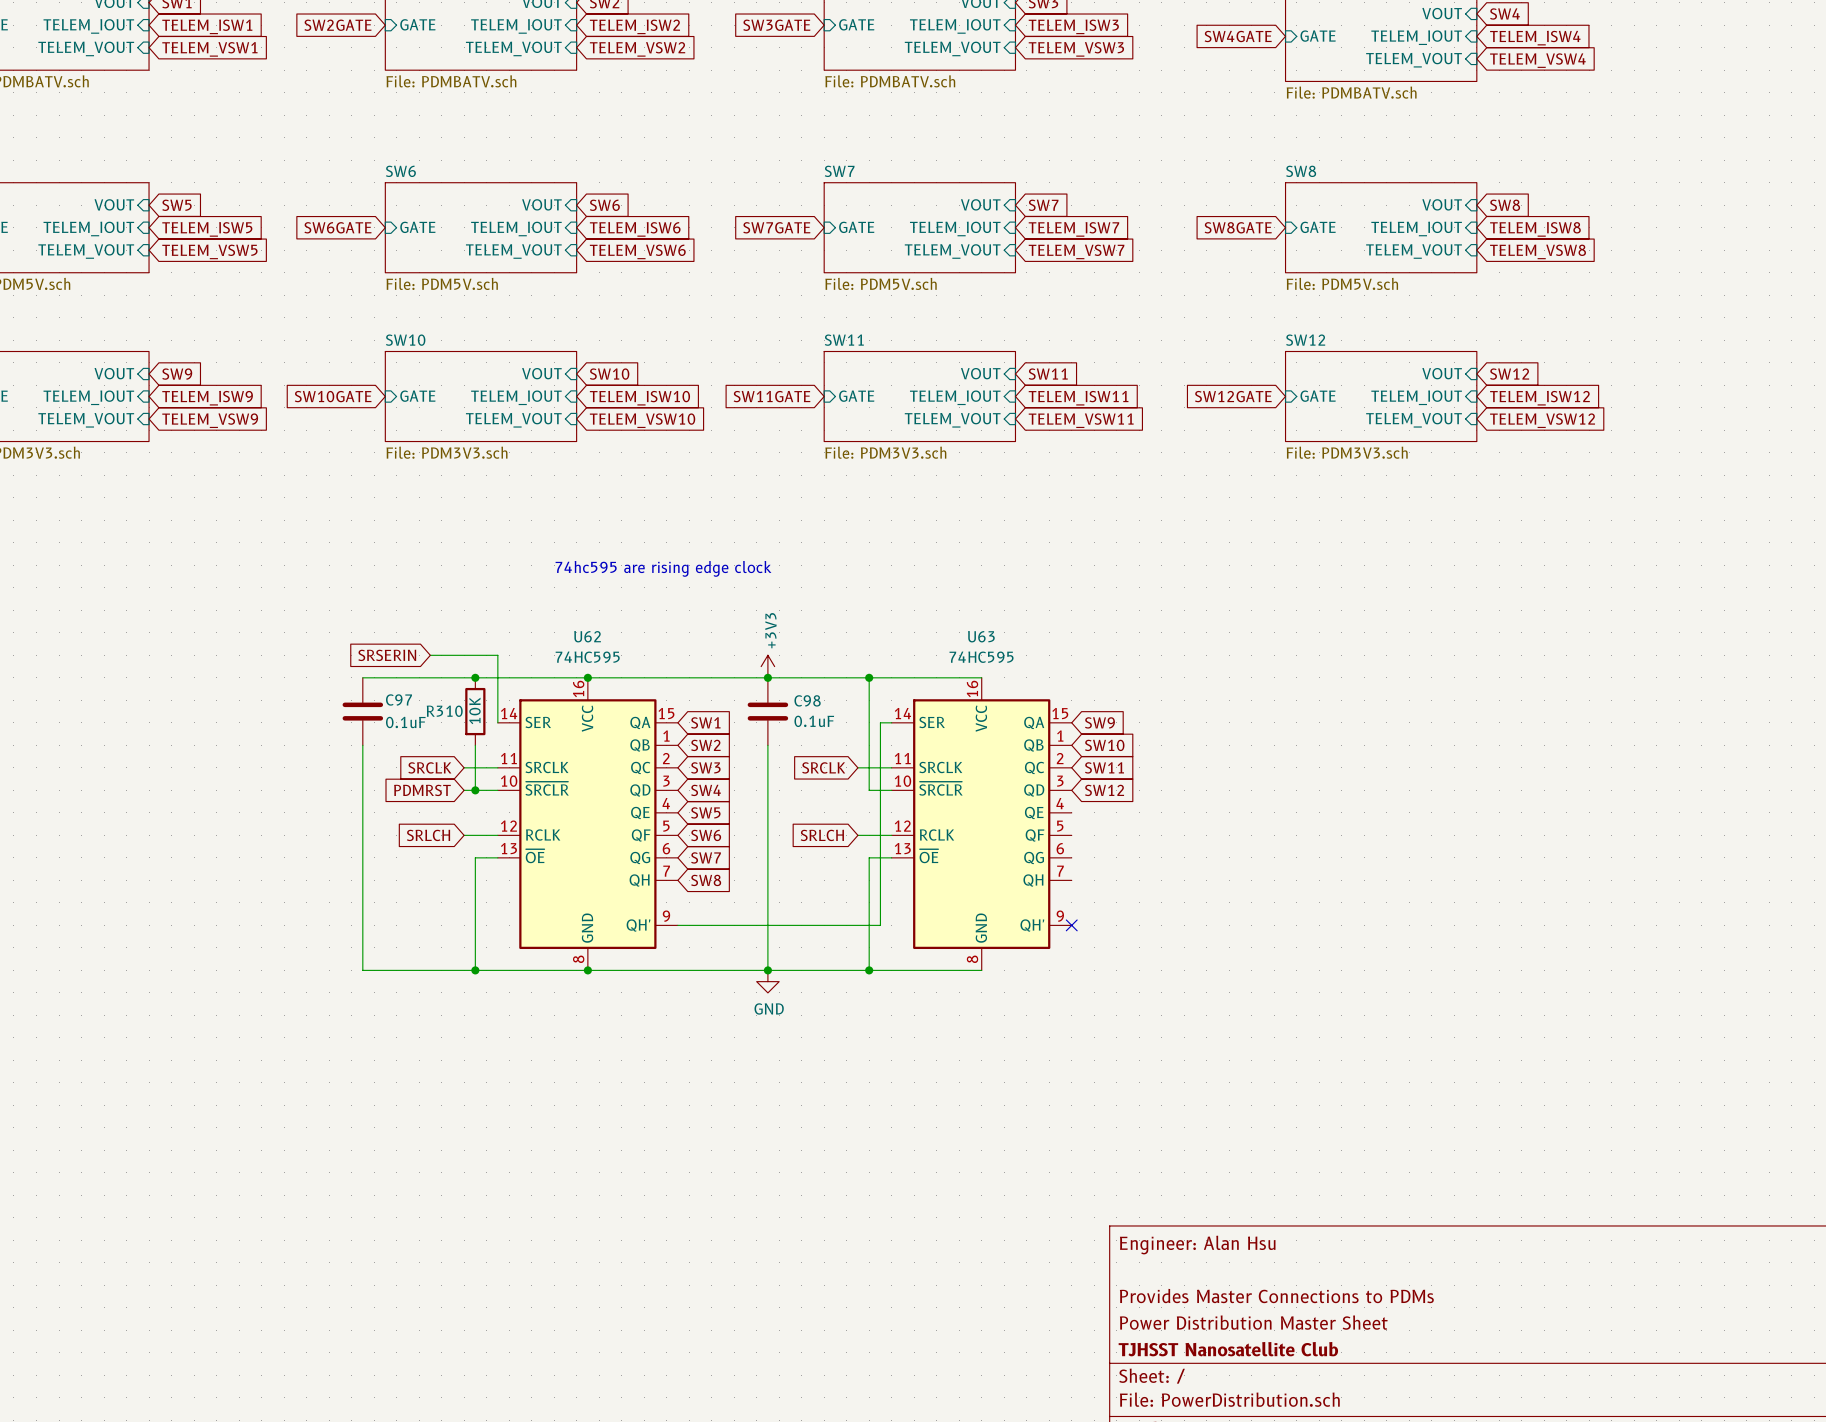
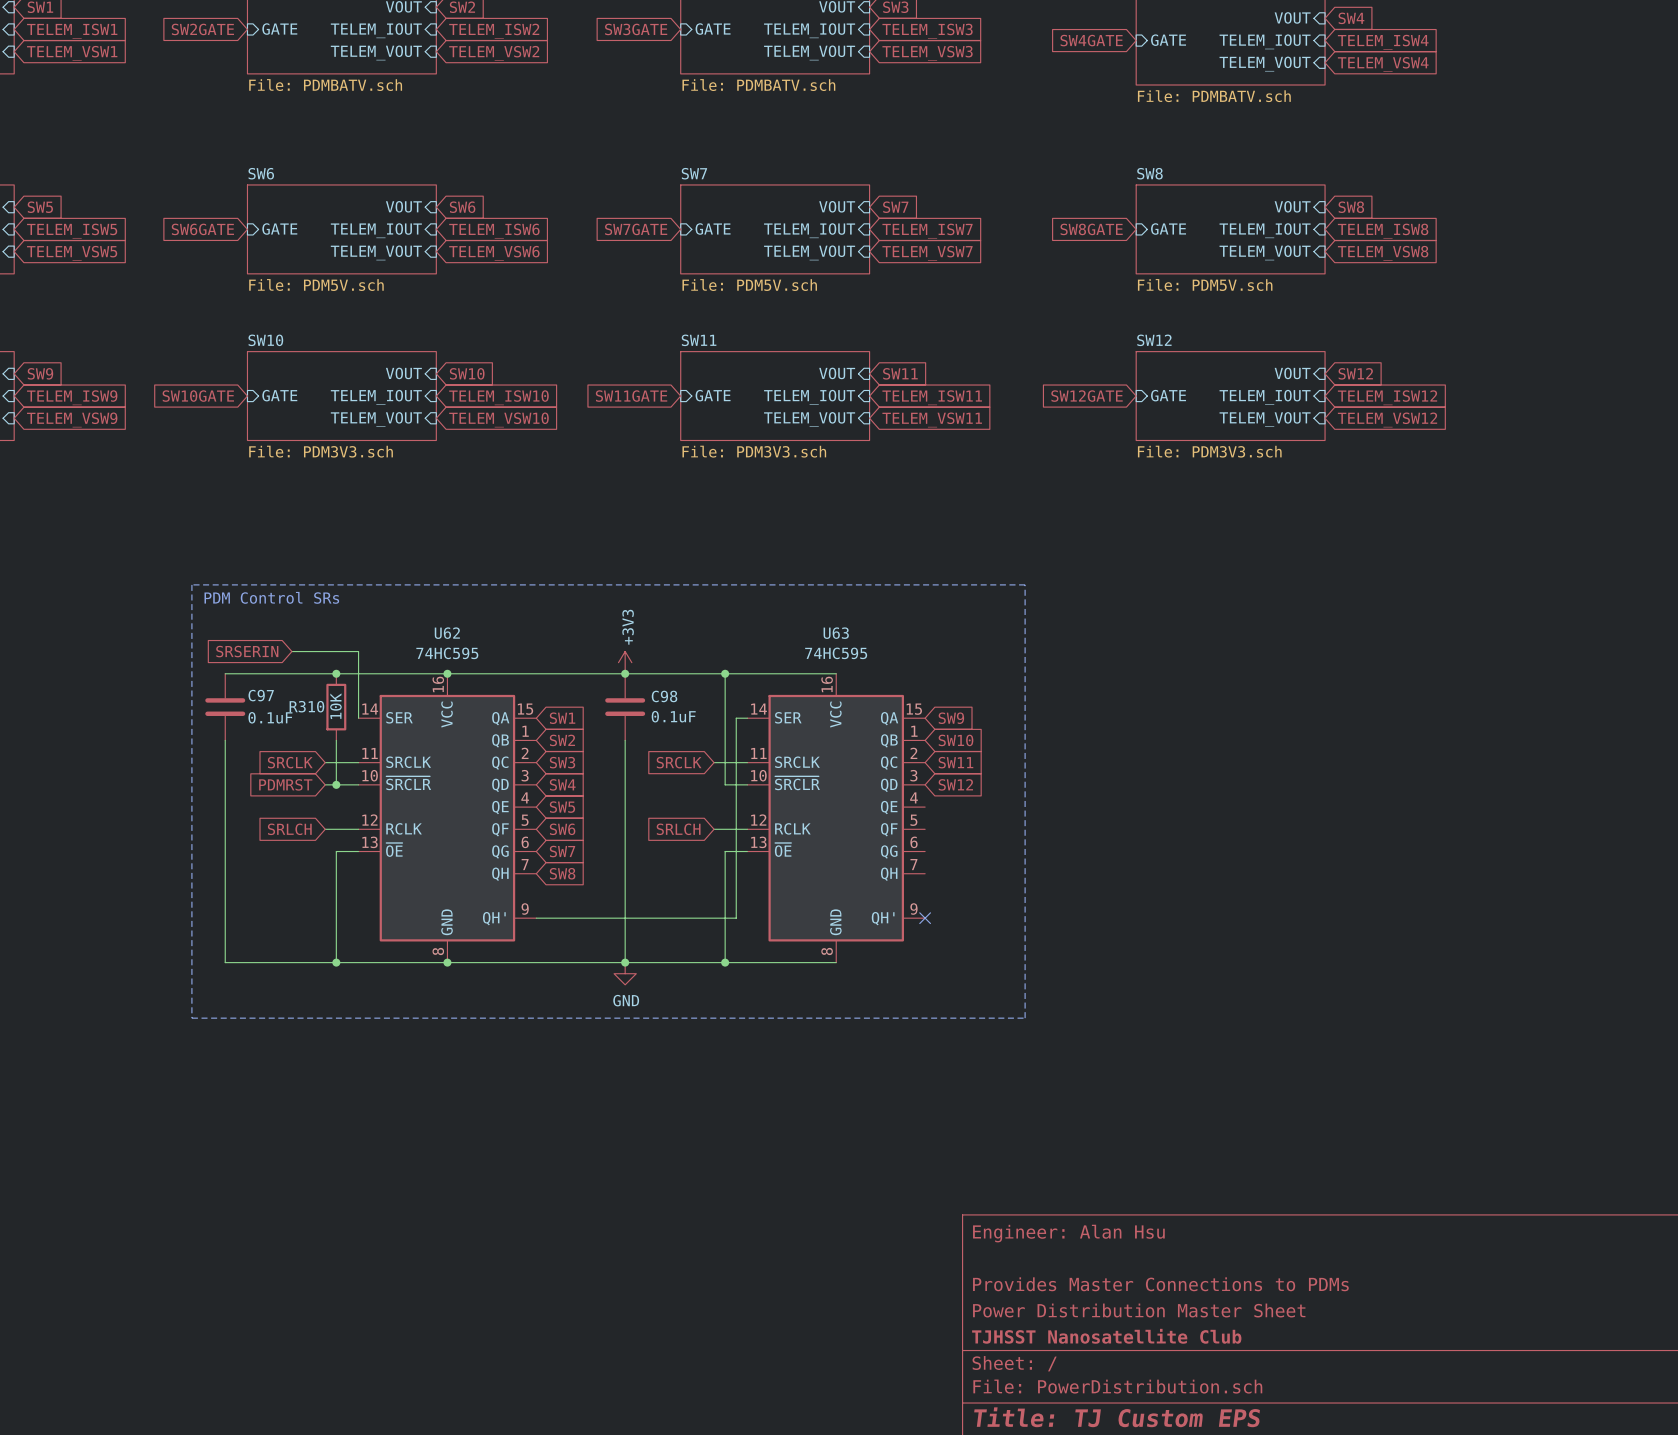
text: 74hc595 are rising edge clock (663, 568) -> none
line: none -> (191, 584) (191, 1018) (1025, 1018) (1025, 584) (191, 584)
text: none -> PDM Control SRs (271, 597)

